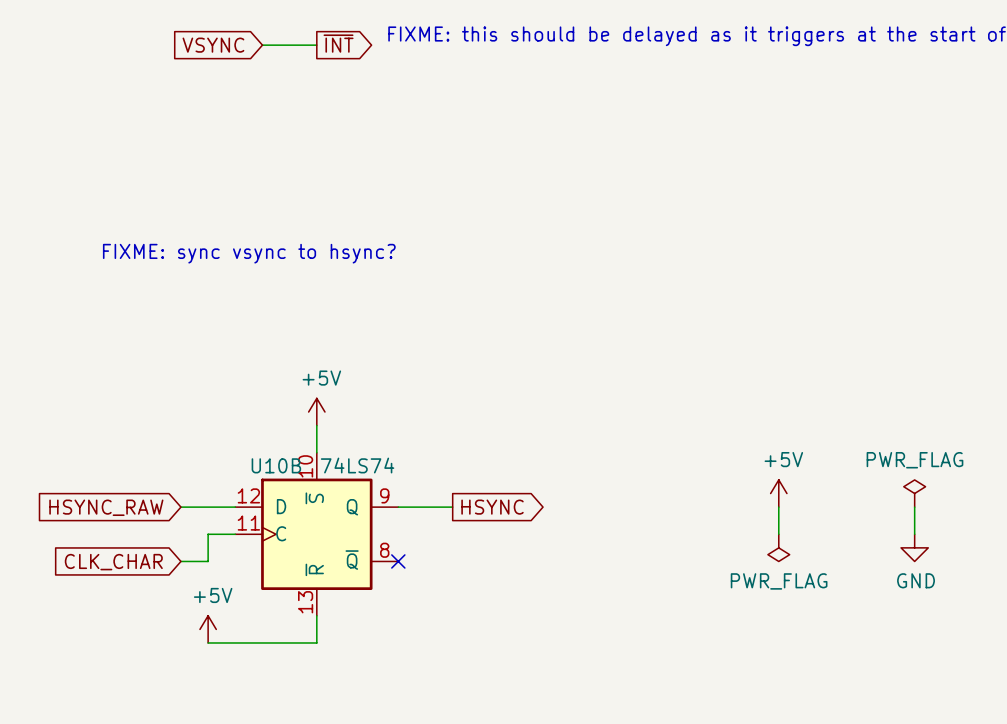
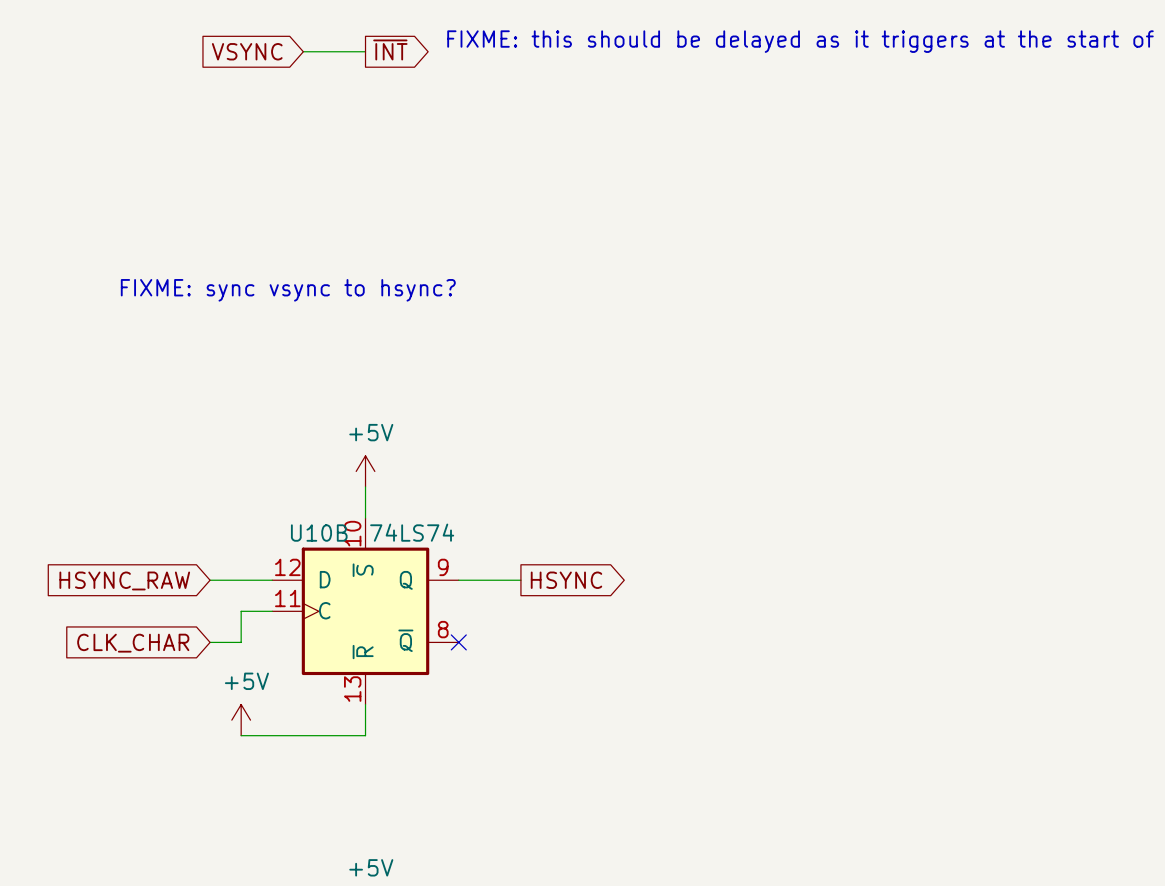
power symbol: +5V (778, 493) -> none
power symbol: PWR_FLAG (914, 493) -> none
wire: (778, 507) (778, 534) -> none
wire: (914, 507) (914, 534) -> none
power symbol: PWR_FLAG (778, 547) -> none
power symbol: GND (914, 547) -> none

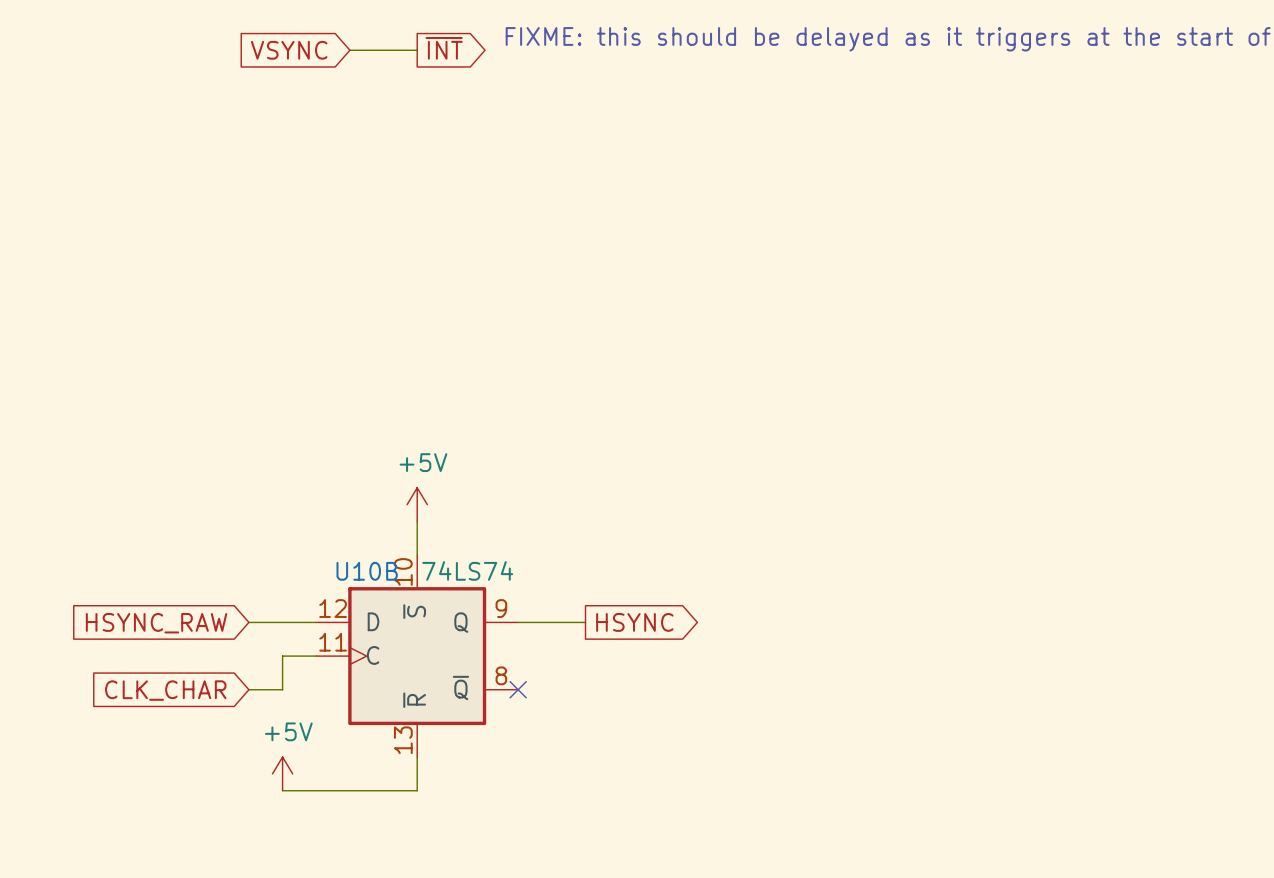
text: FIXME: sync vsync to hsync? (288, 290) -> none

